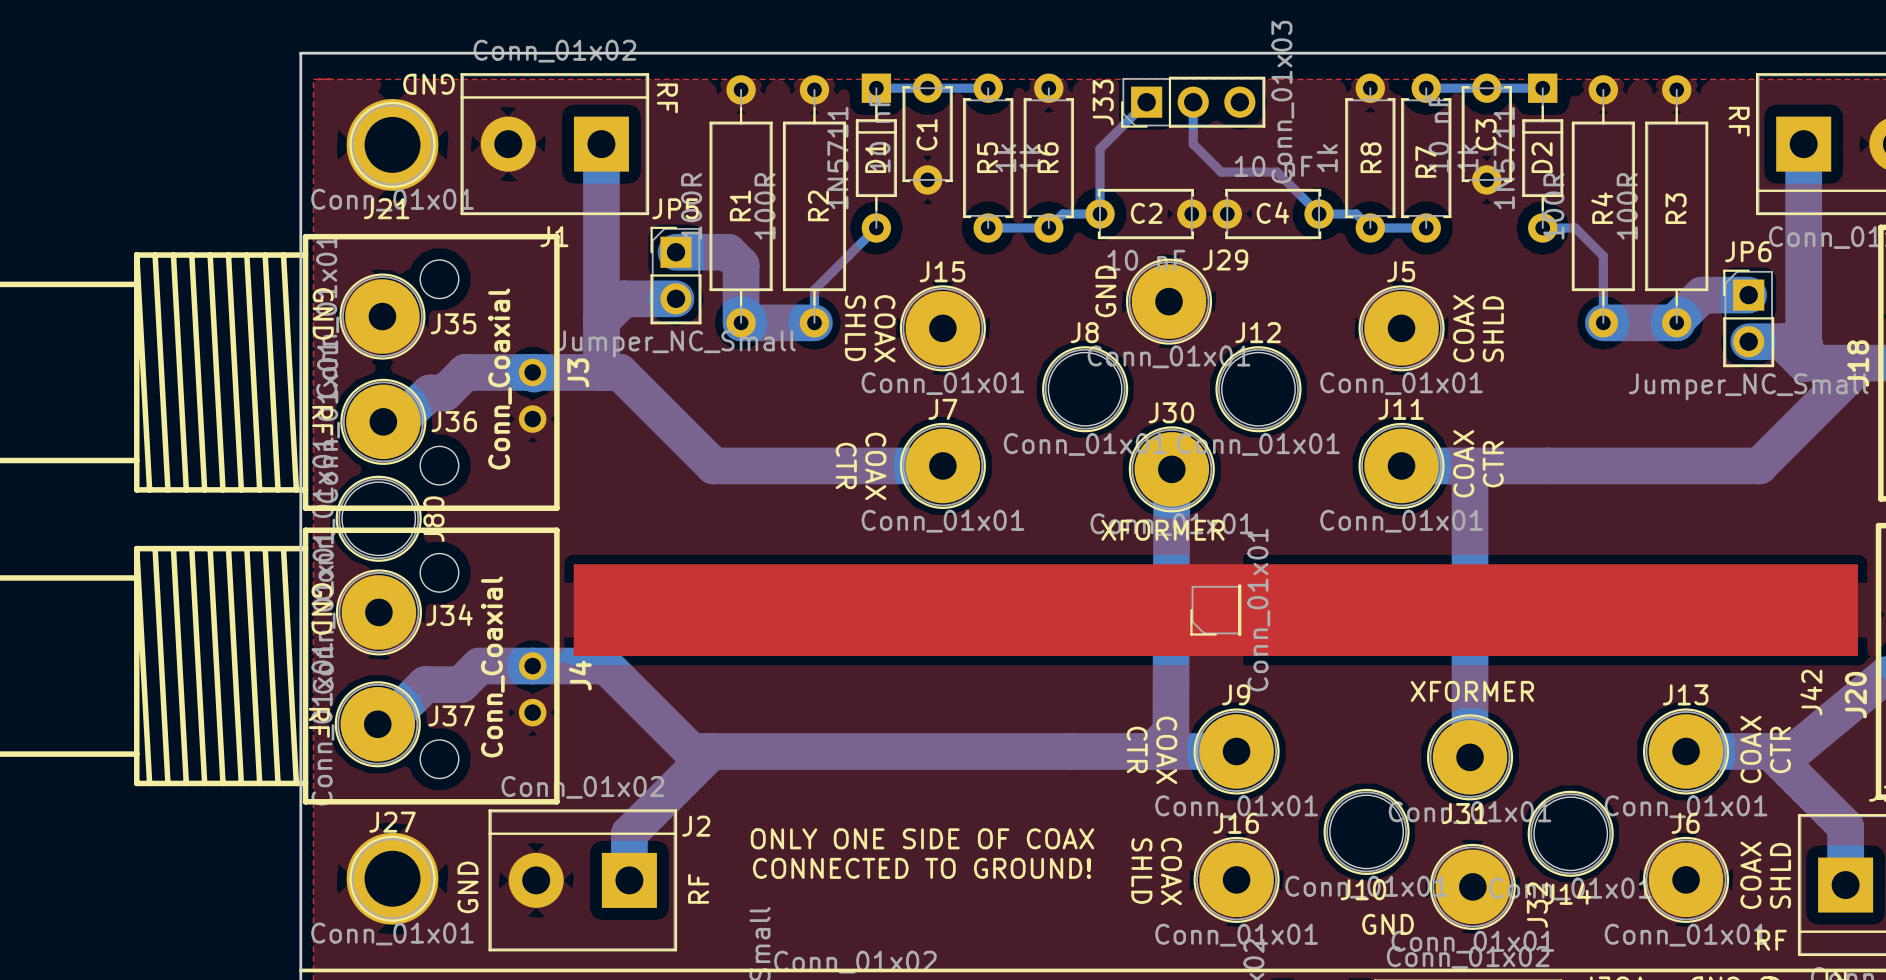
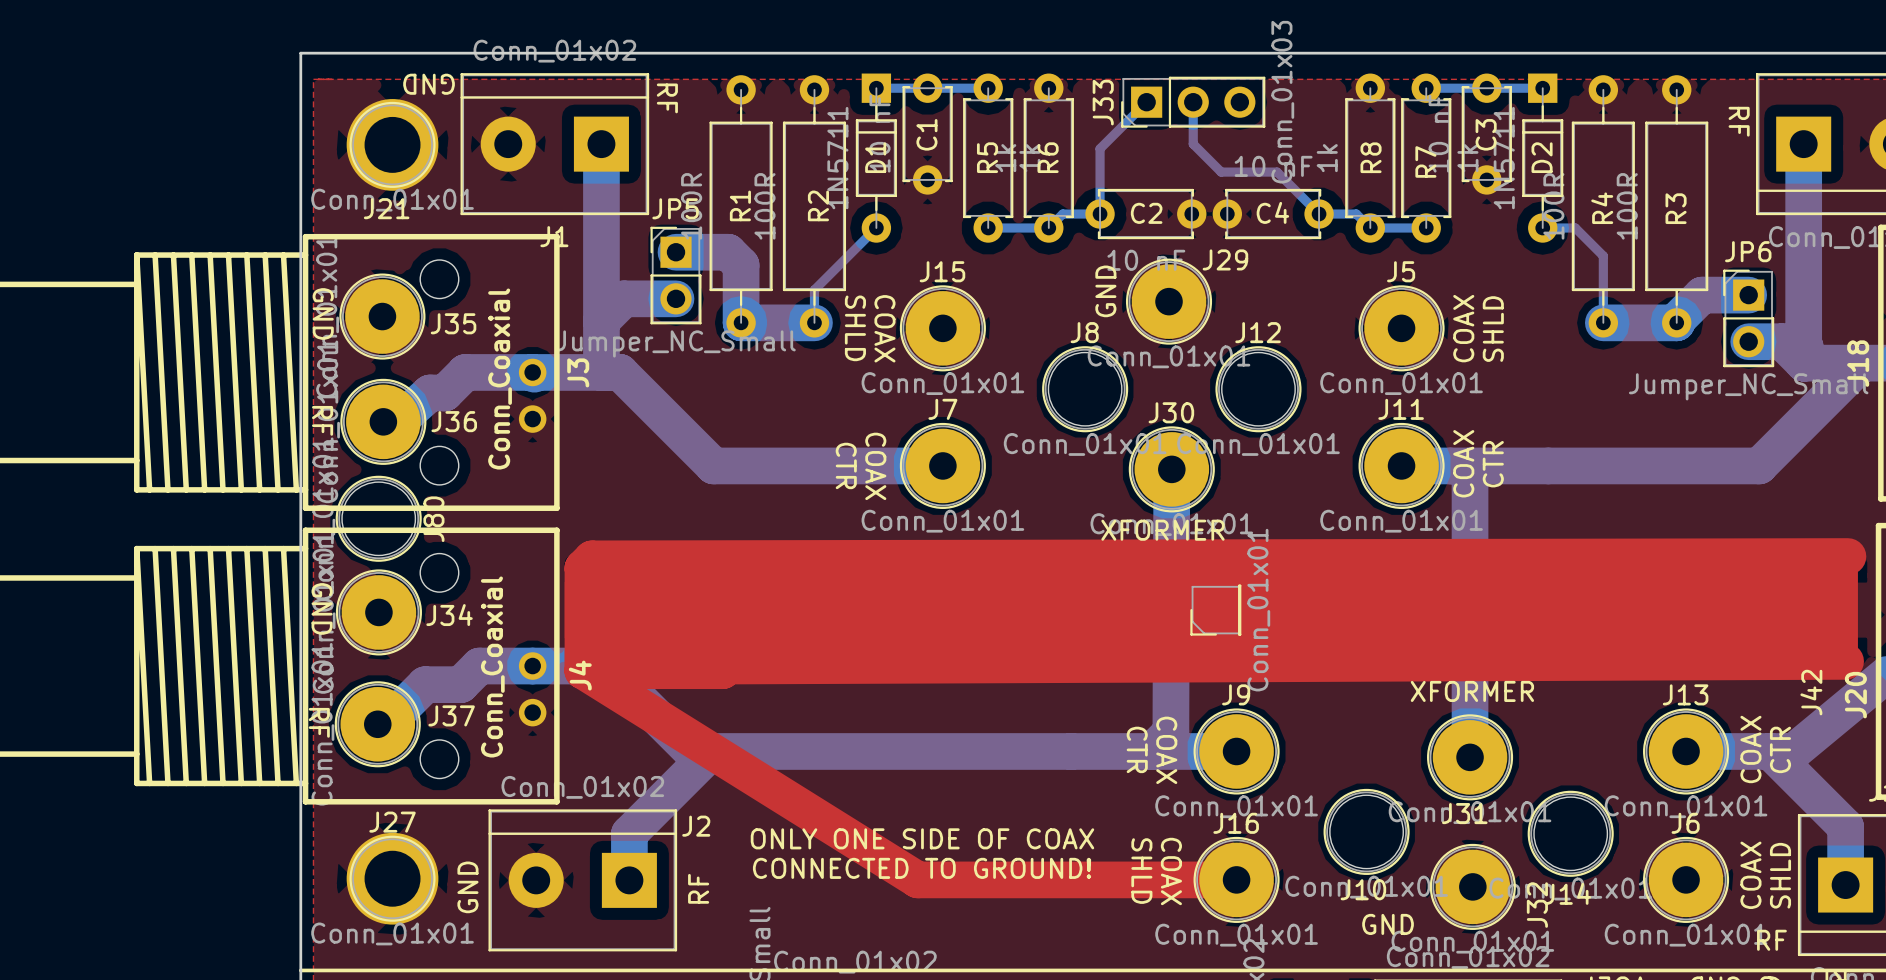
top track: none -> (1847, 556) (592, 558) (582, 568) (582, 670)
top track: none -> (1845, 661) (727, 666) (722, 670) (582, 670)
top track: none -> (582, 670) (917, 879) (1236, 879)

